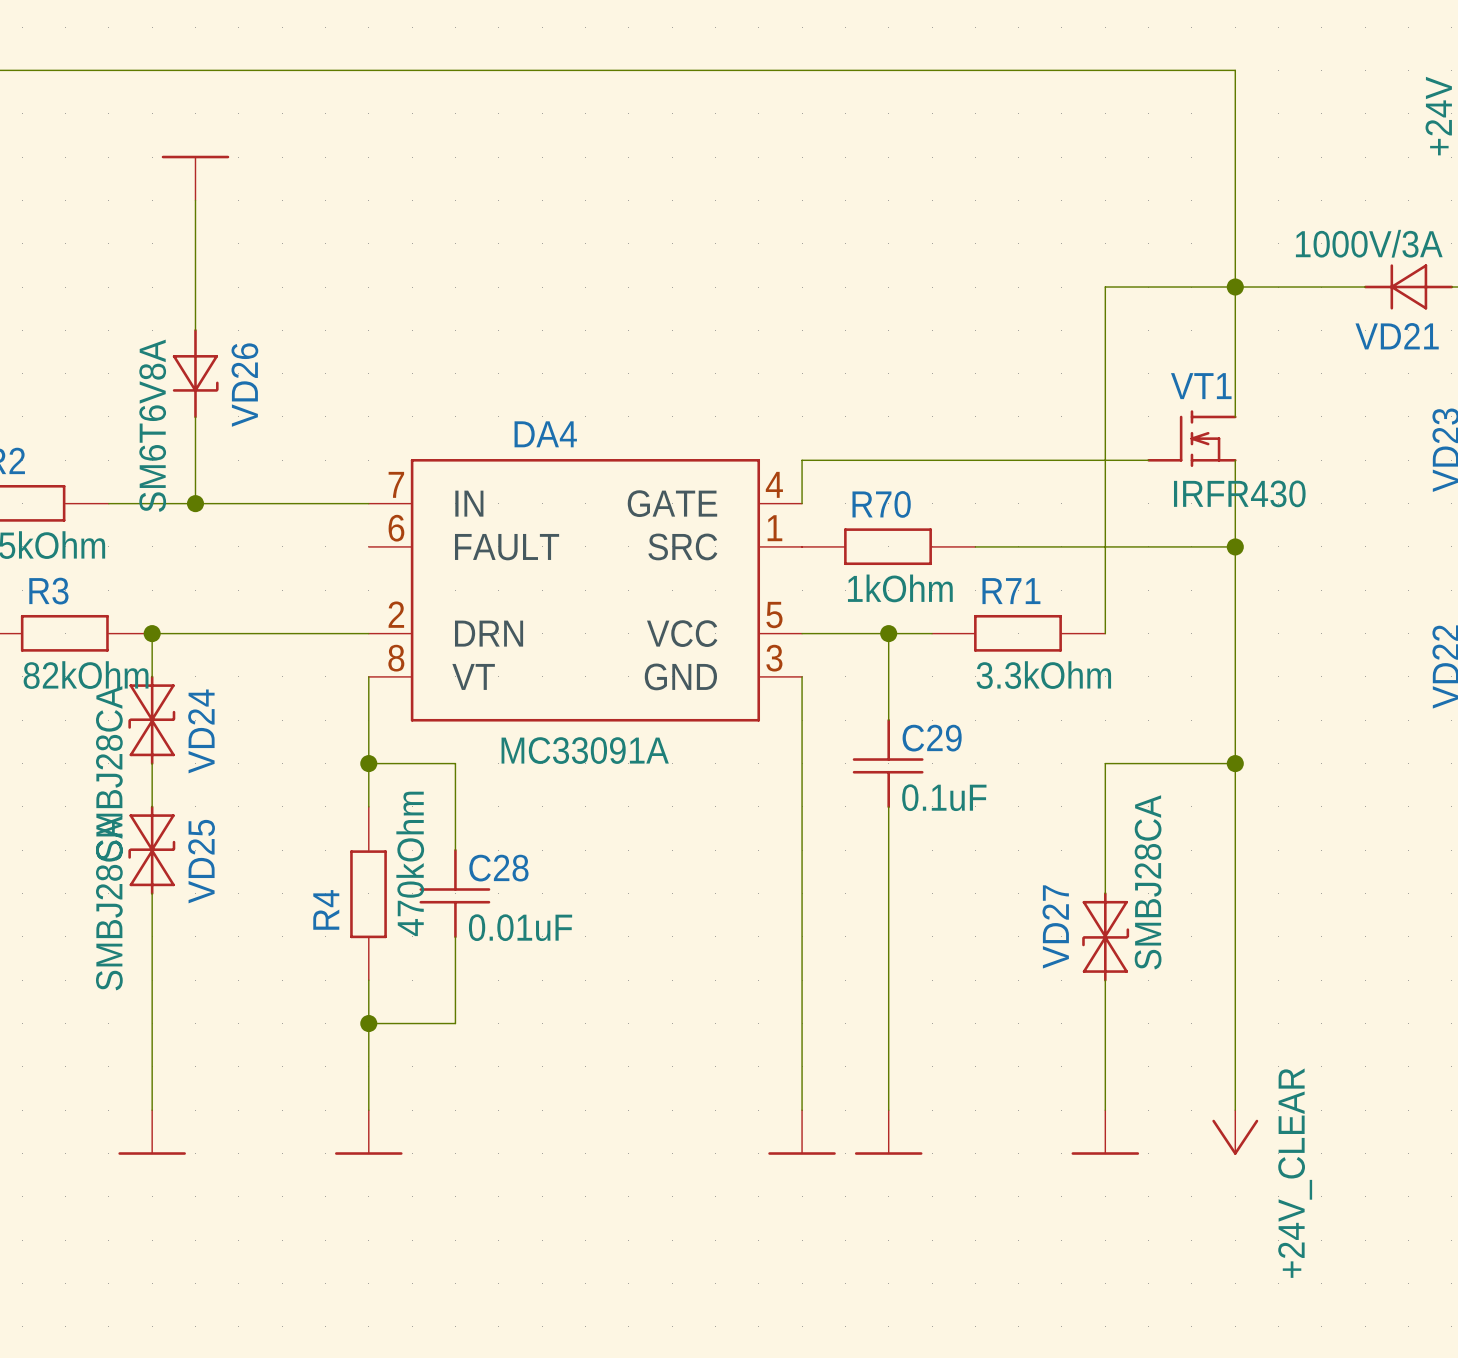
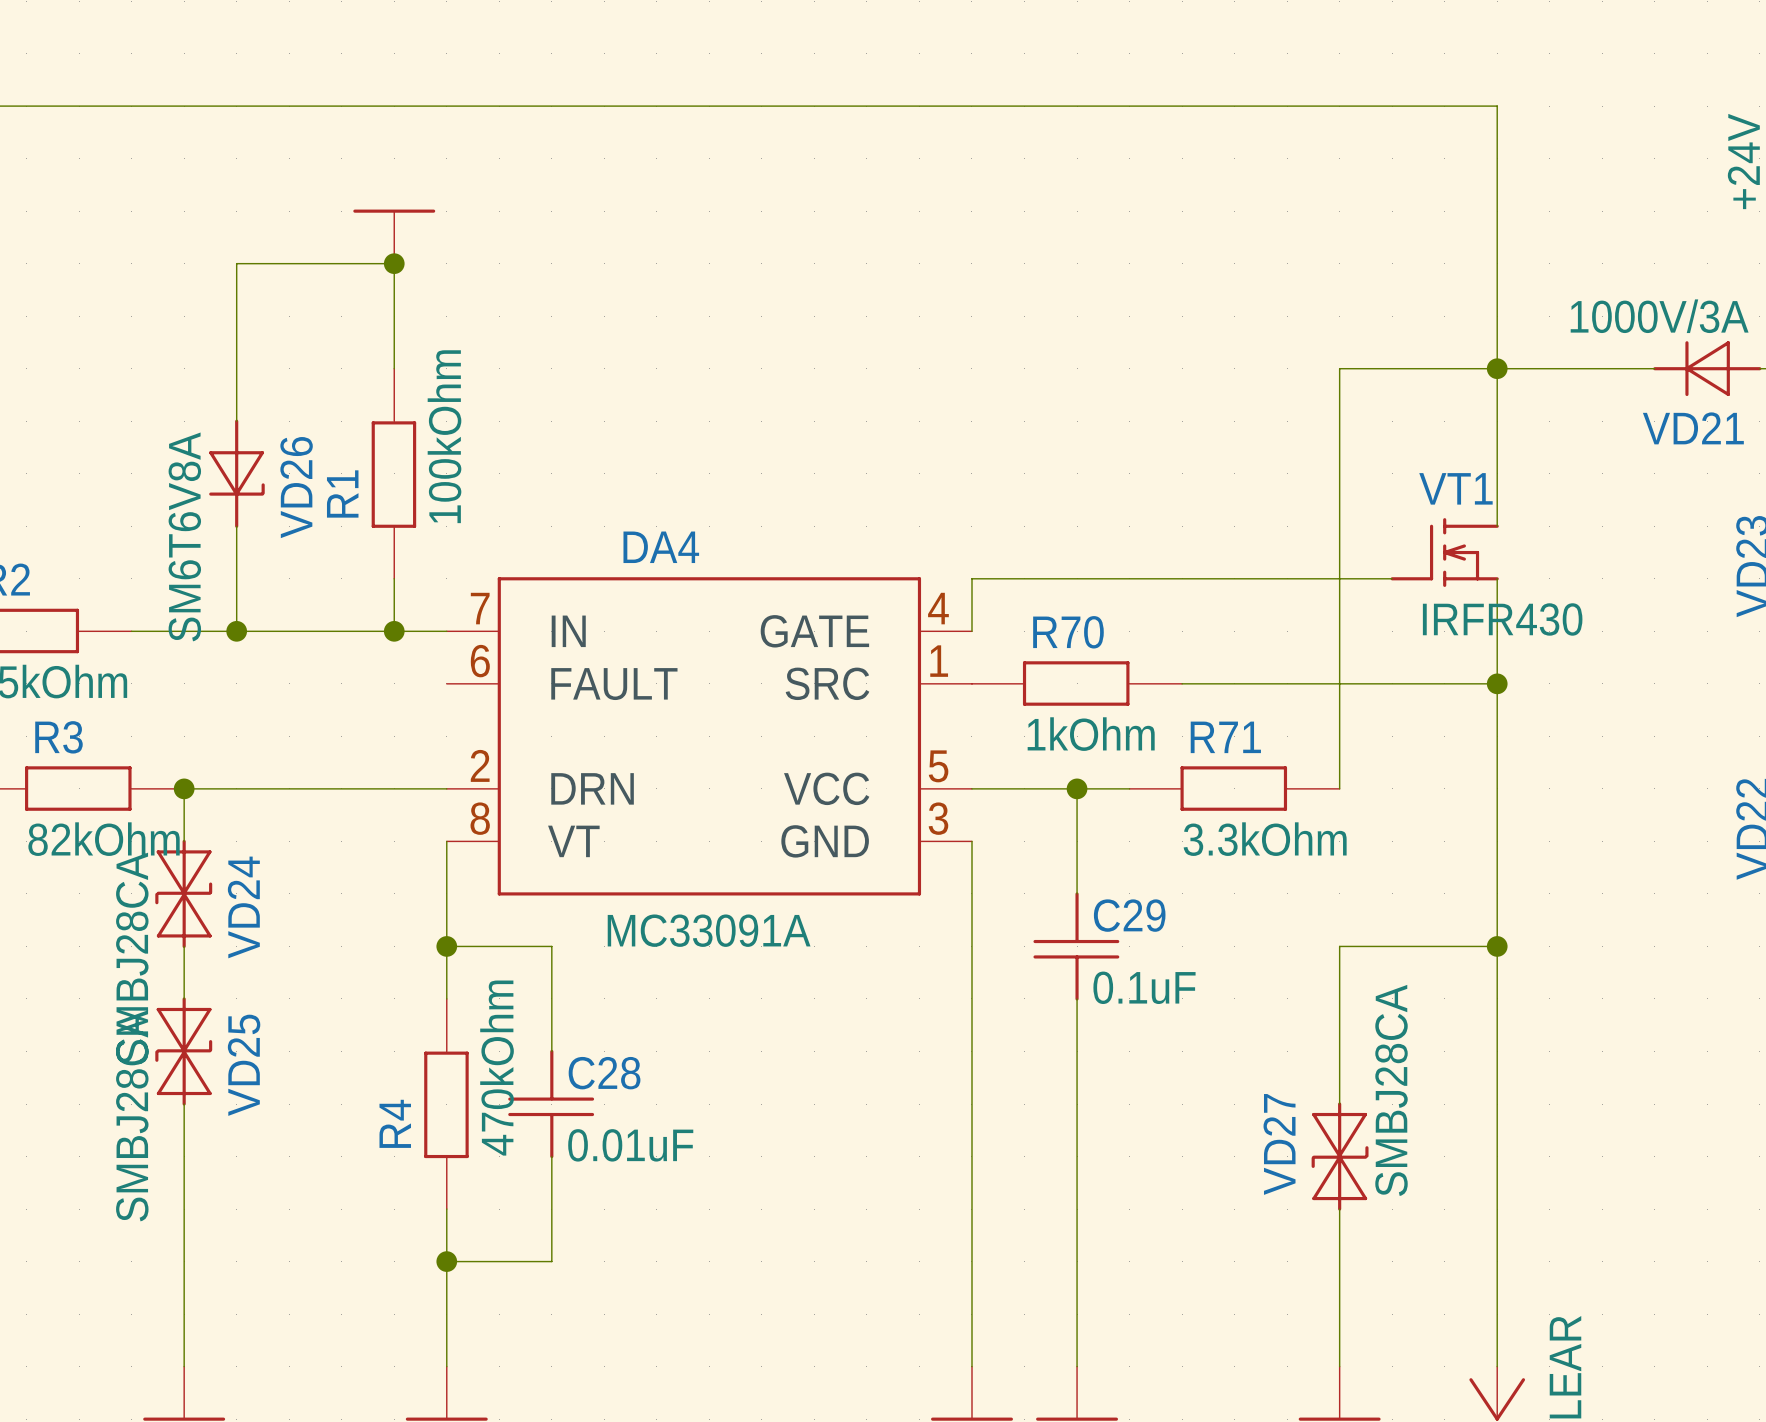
power symbol position: (195, 178) -> (394, 236)
wire: none -> (236, 263) (394, 263) (394, 368)
junction: none -> (394, 263)
R1: none -> 100kOhm (393, 473)
wire: none -> (394, 578) (394, 631)
junction: none -> (394, 631)

